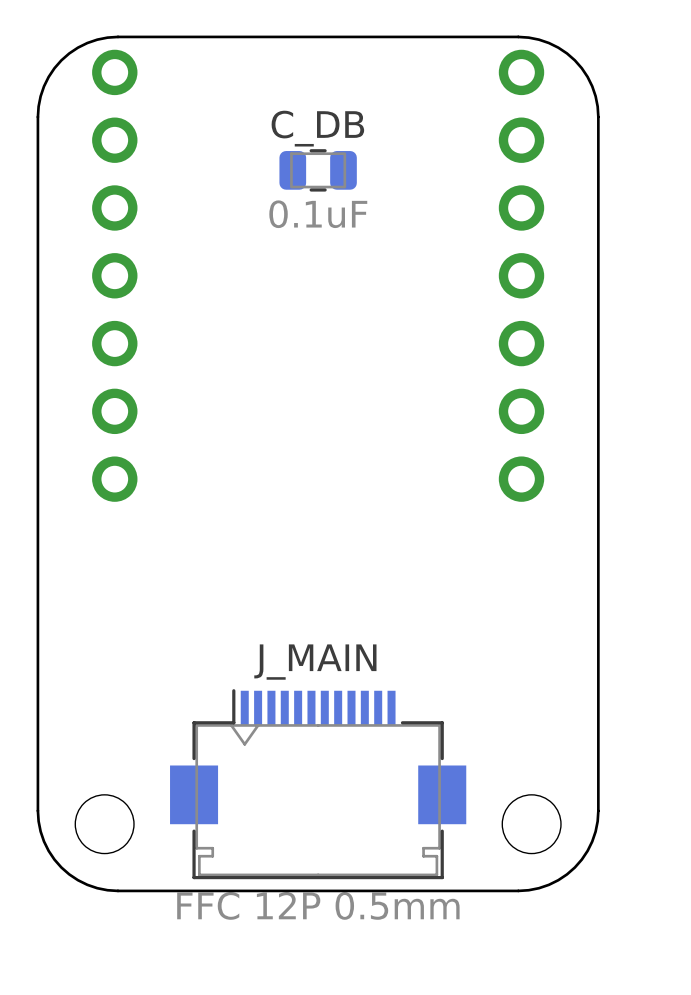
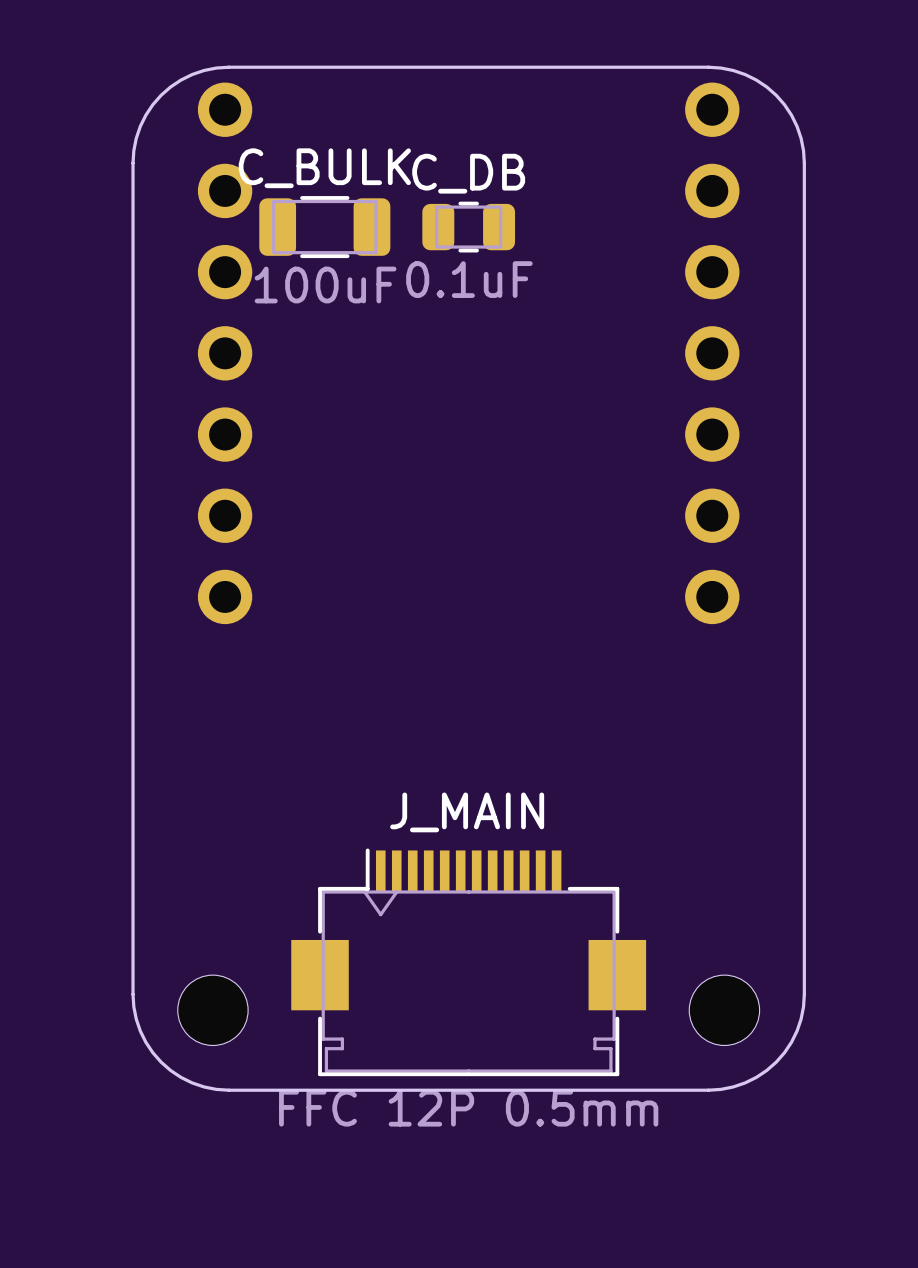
C_BULK: none -> 100uF (324, 227)

